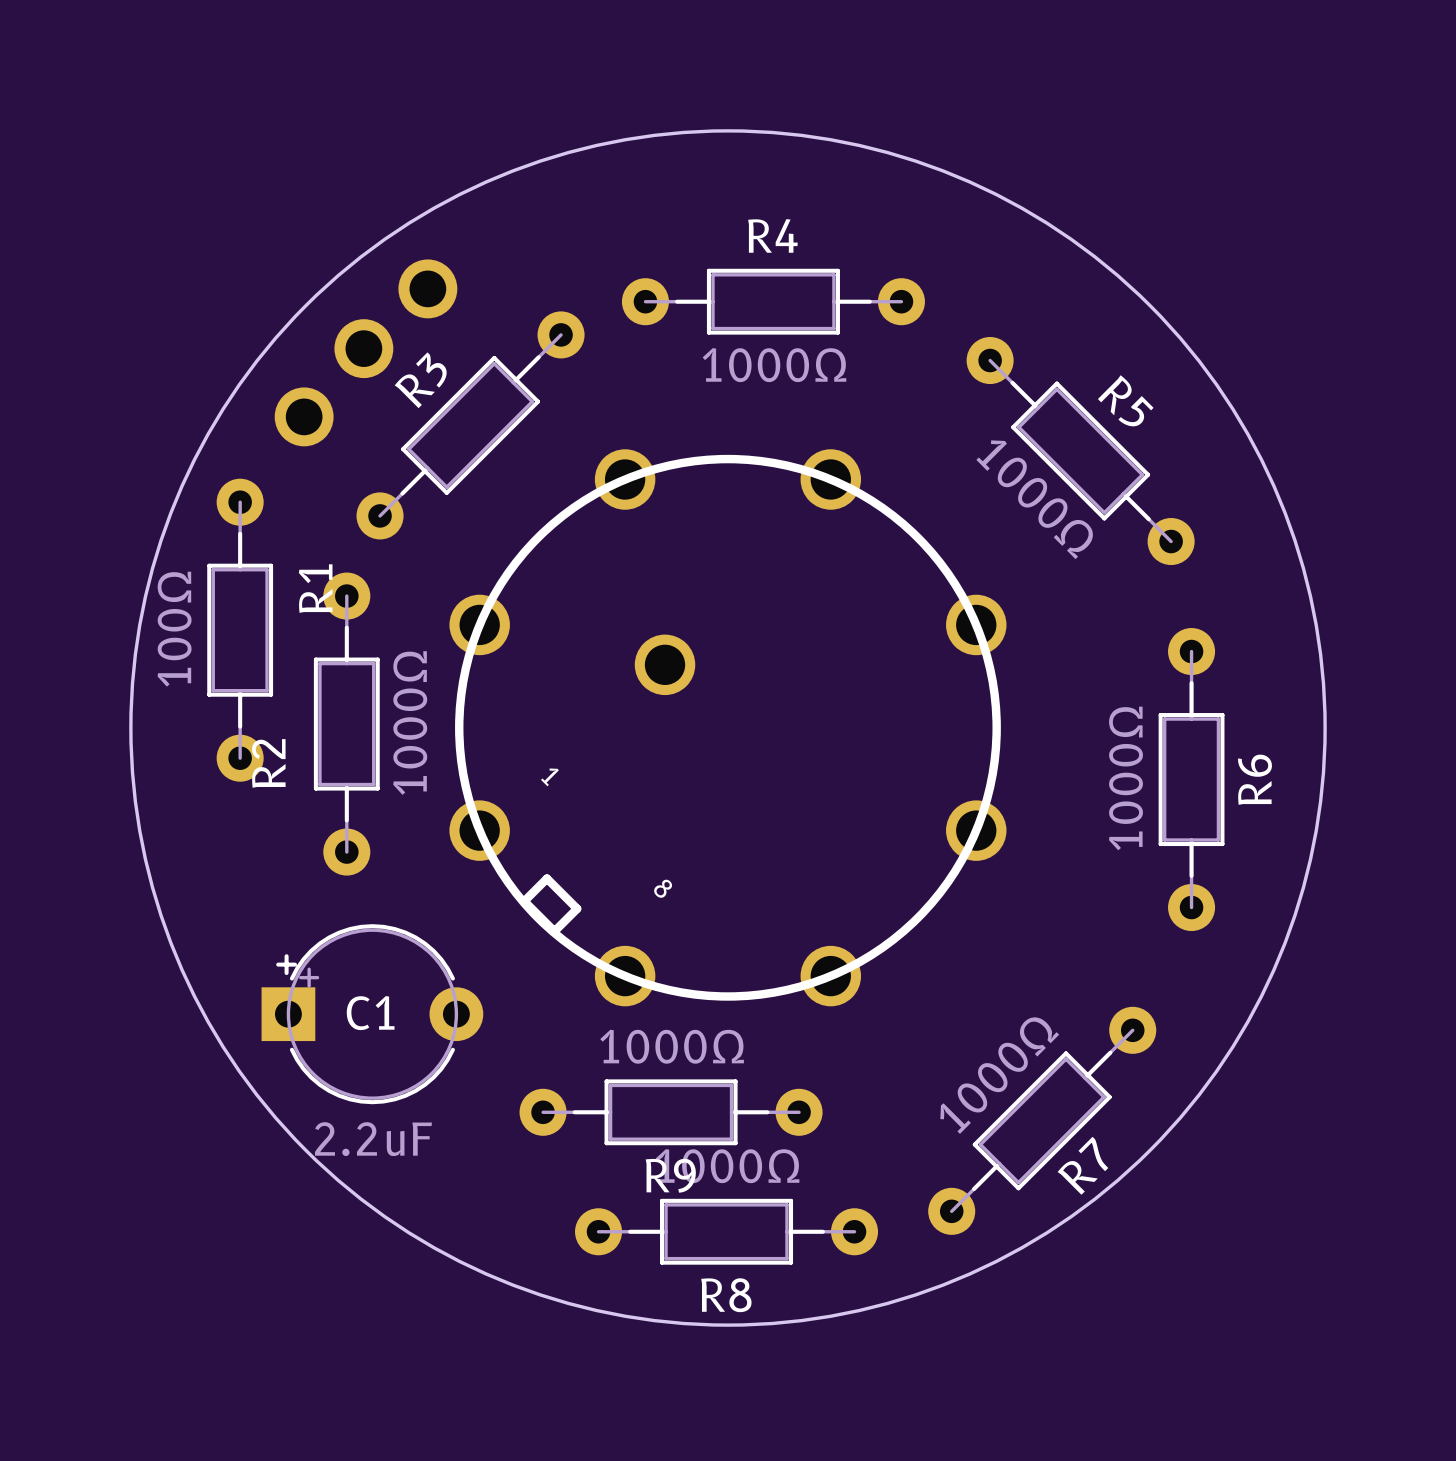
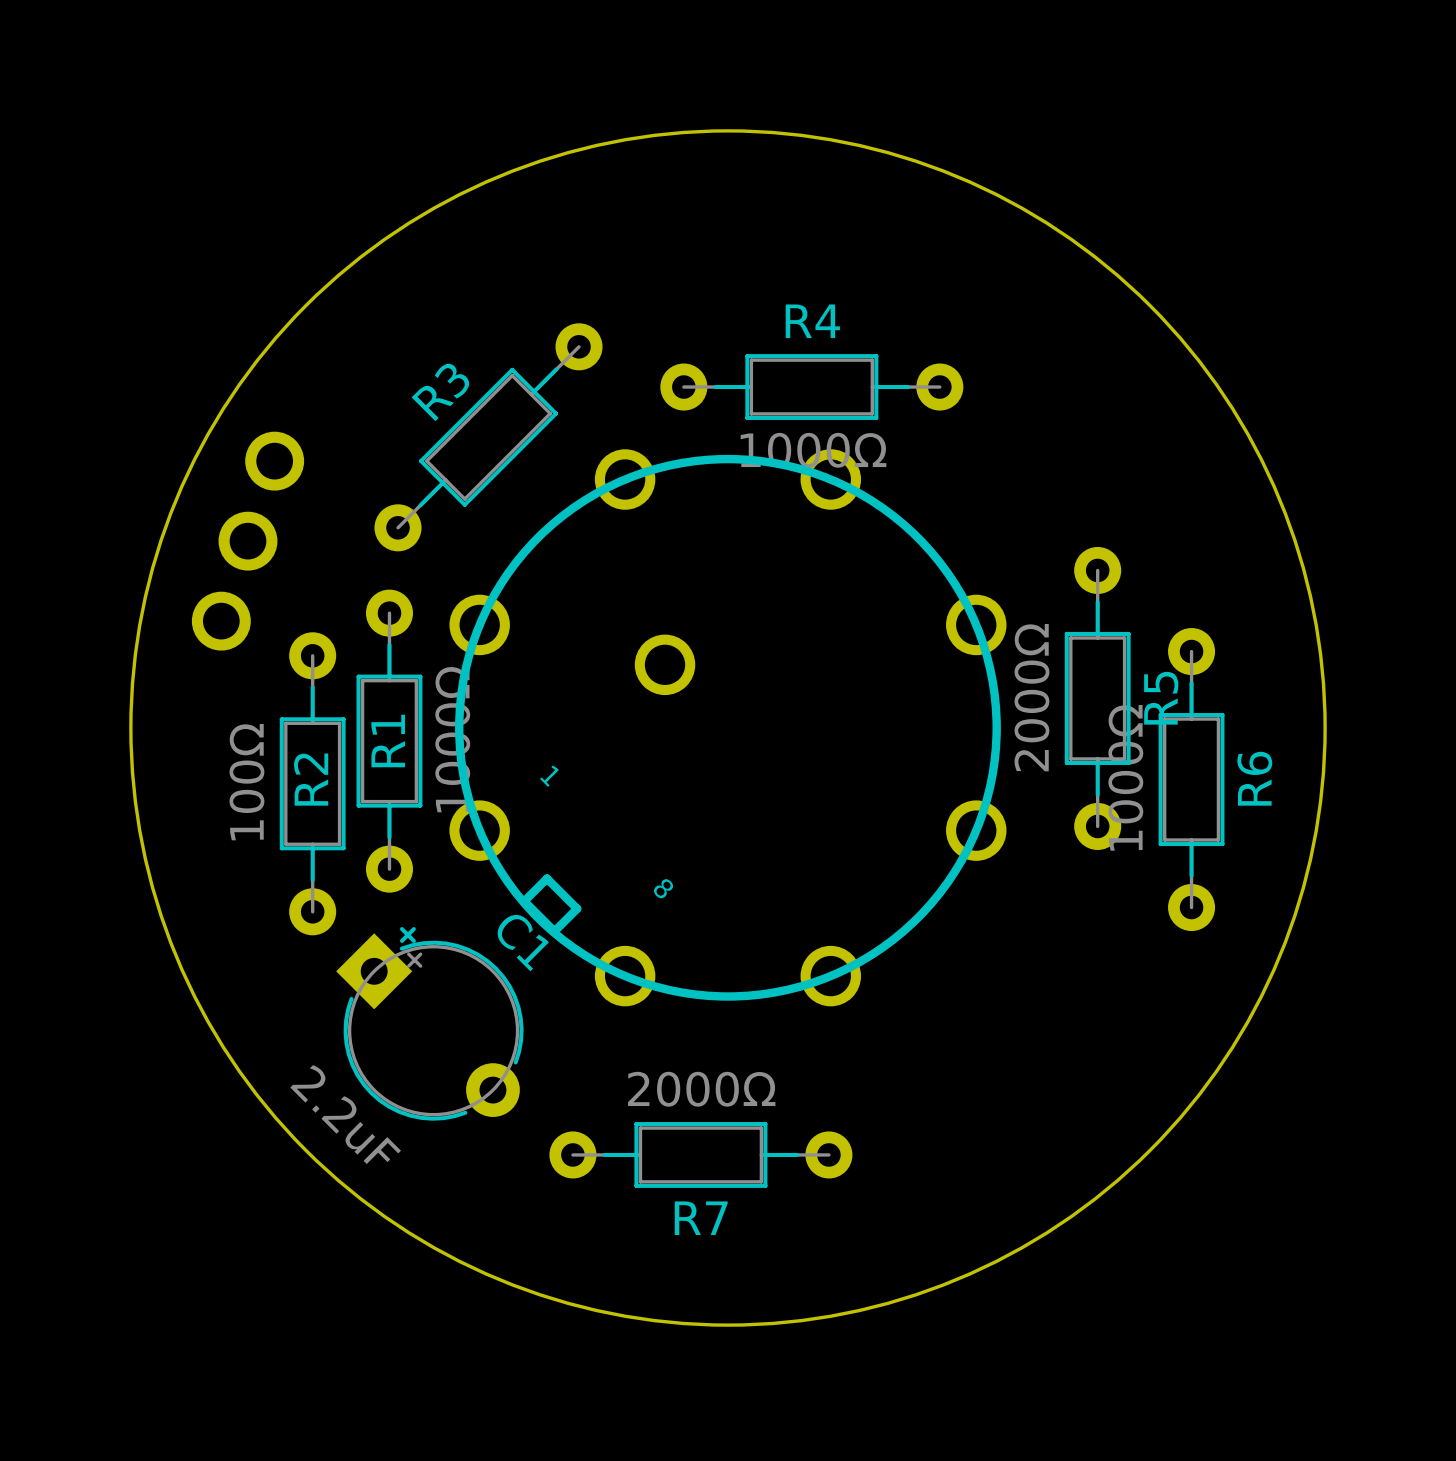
part: (427, 288) -> none
R4 position: (773, 301) -> (811, 387)
part: (363, 348) -> none
part position: (304, 416) -> (274, 461)
R3 position: (470, 425) -> (488, 437)
R5 rotation: 0° (1080, 451) -> 45° clockwise (1097, 698)
R5 position: (1080, 451) -> (1097, 698)
R5 value: 1000Ω (1034, 499) -> 2000Ω (1031, 697)
part: none -> (247, 541)
part: none -> (221, 621)
R1 position: (240, 630) -> (312, 783)
R2 position: (346, 724) -> (389, 741)
C1 name position: C1 (370, 1013) -> C1 (523, 943)
C1 rotation: 0° (372, 1014) -> 45° clockwise (429, 1023)
R7 value: 1000Ω (999, 1075) -> 2000Ω (701, 1089)
R9: 1000Ω (671, 1112) -> none
R7 rotation: 0° (1042, 1120) -> 45° clockwise (700, 1154)
R7 position: (1042, 1120) -> (700, 1154)
R8: 1000Ω (726, 1231) -> none

